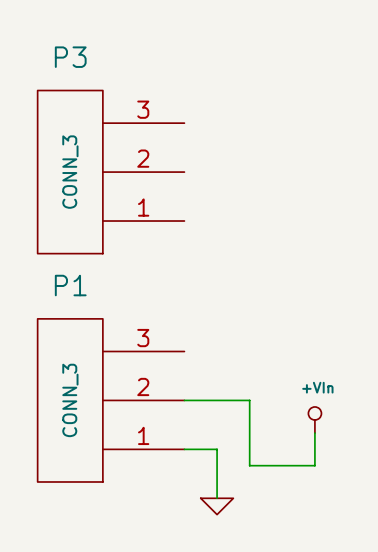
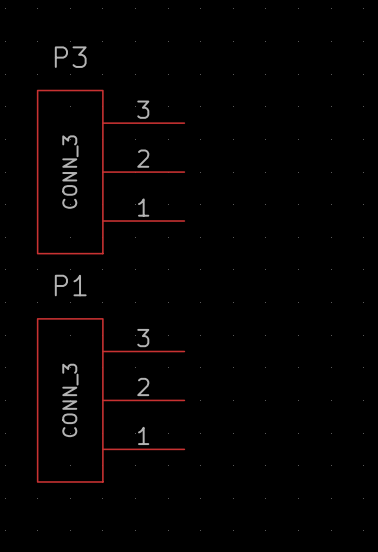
wire: (184, 400) (249, 400) (249, 465) (314, 465) (314, 433) -> none
power symbol: +VIn (314, 420) -> none
wire: (184, 449) (217, 449) (217, 498) -> none
power symbol: (217, 506) -> none

